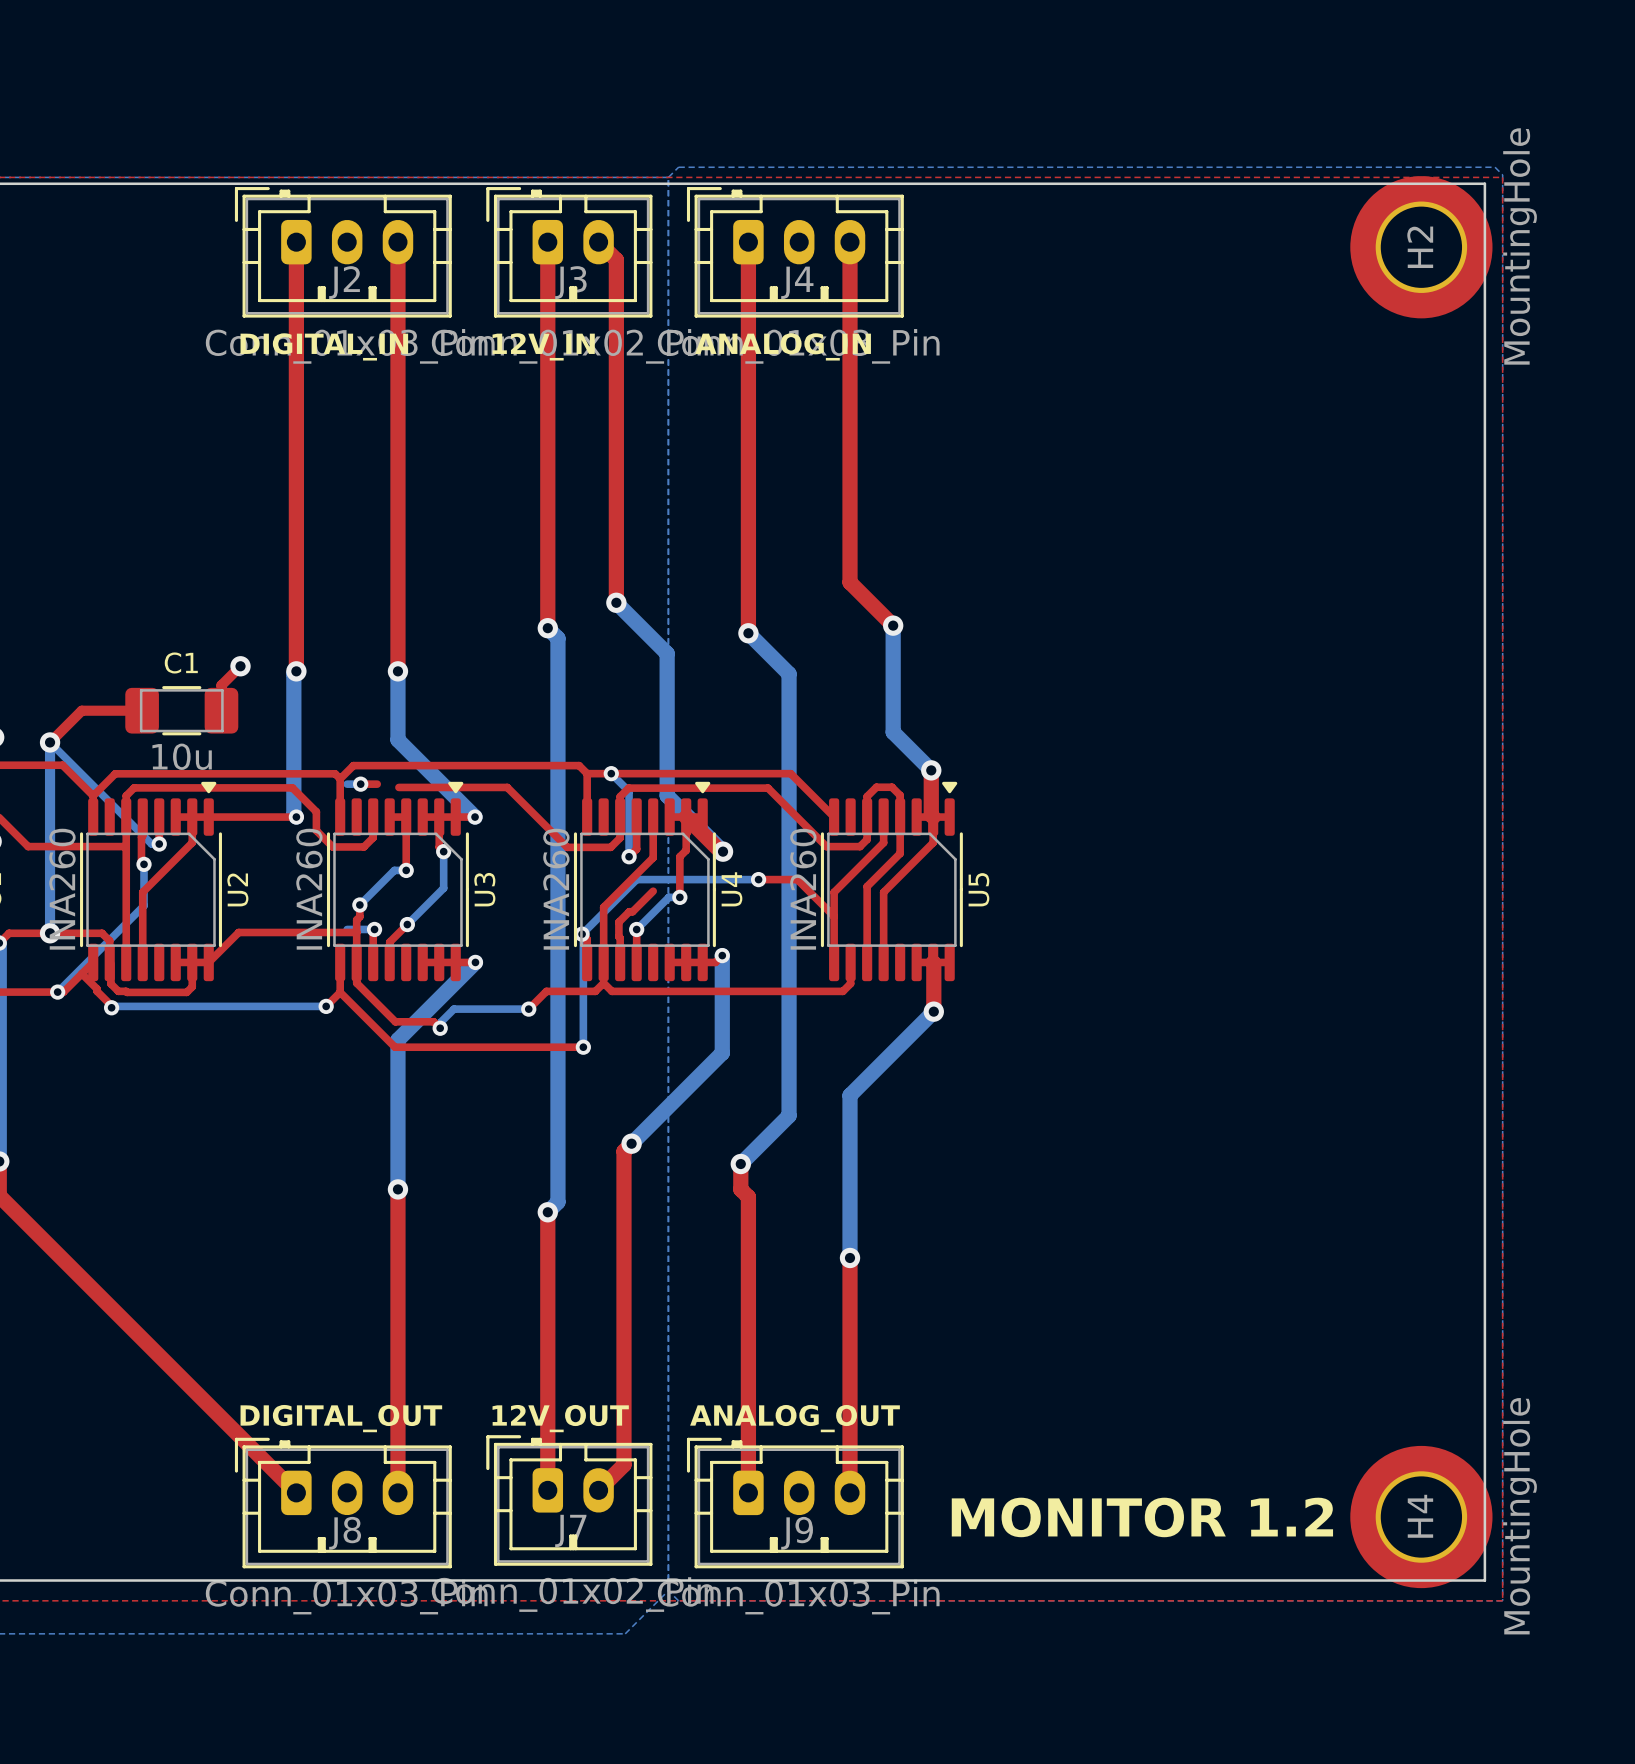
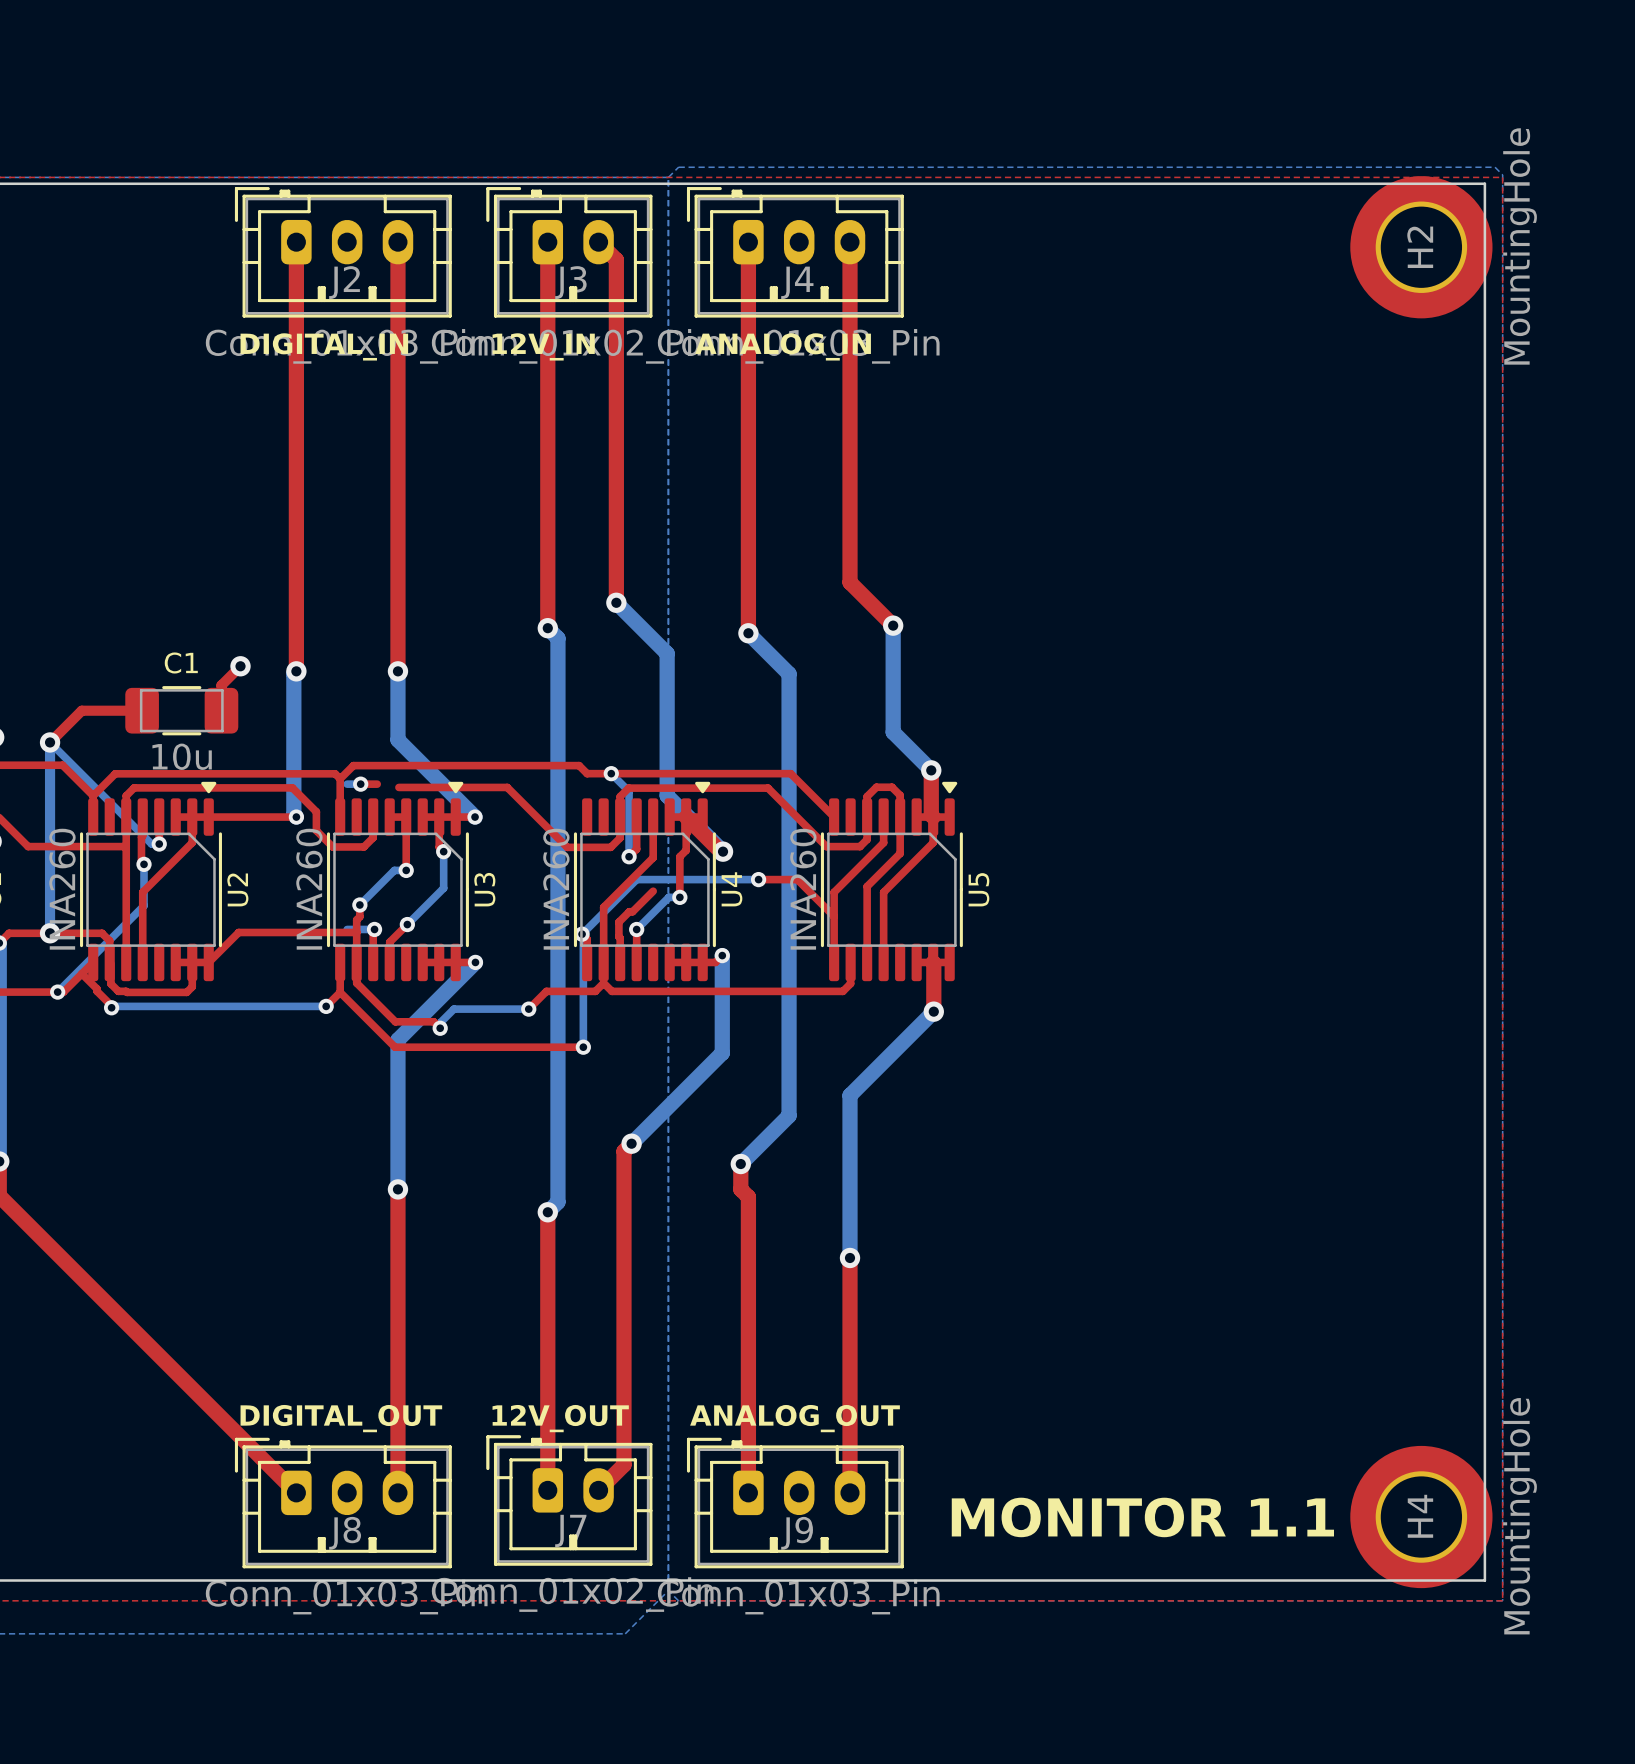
top track: (587, 773) (587, 817) -> none
text: MONITOR 1.2 (1142, 1517) -> MONITOR 1.1 (1142, 1517)

